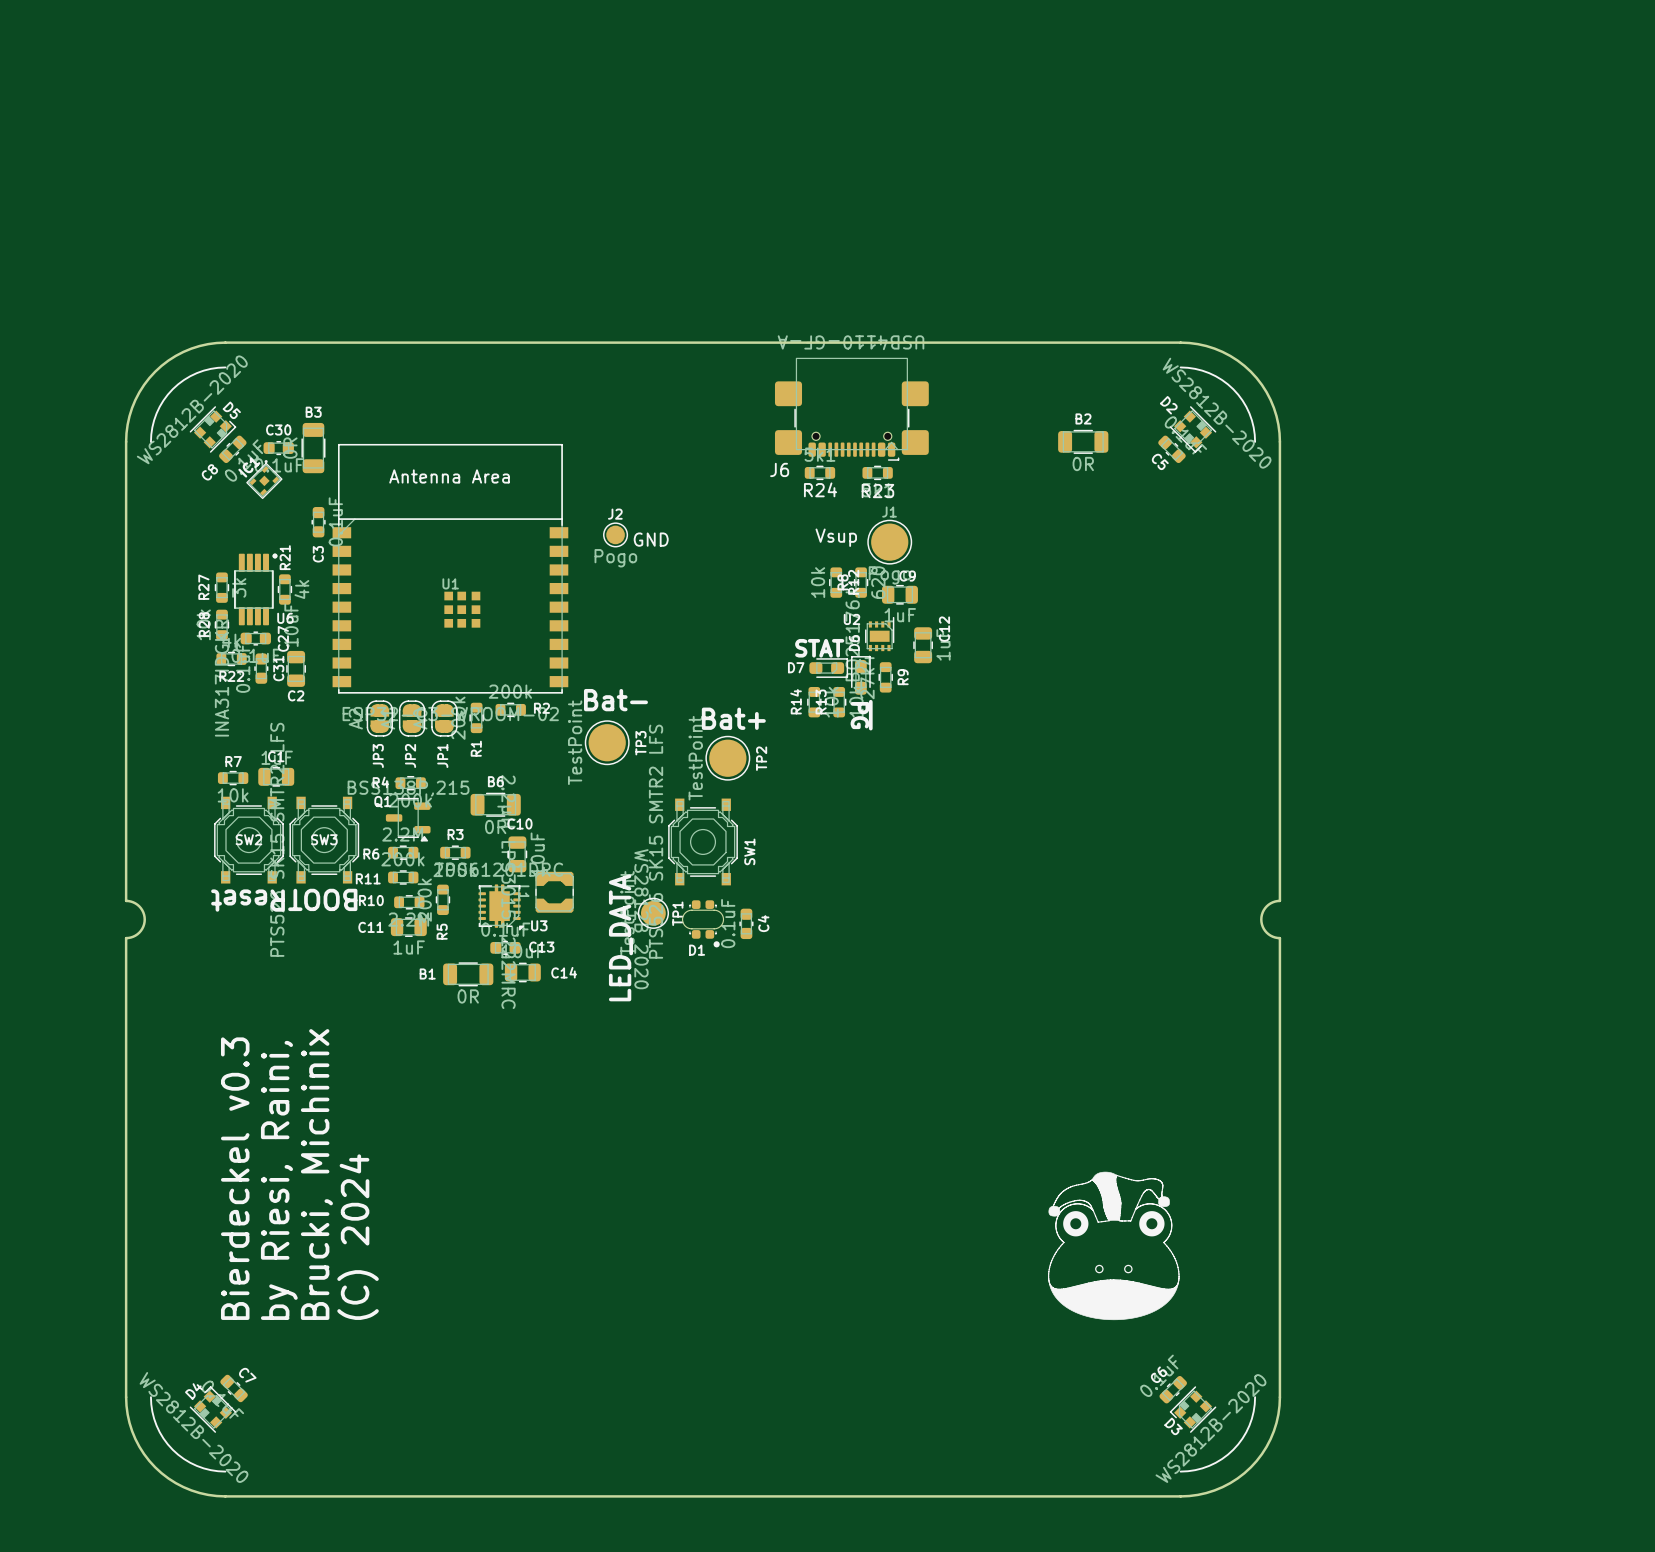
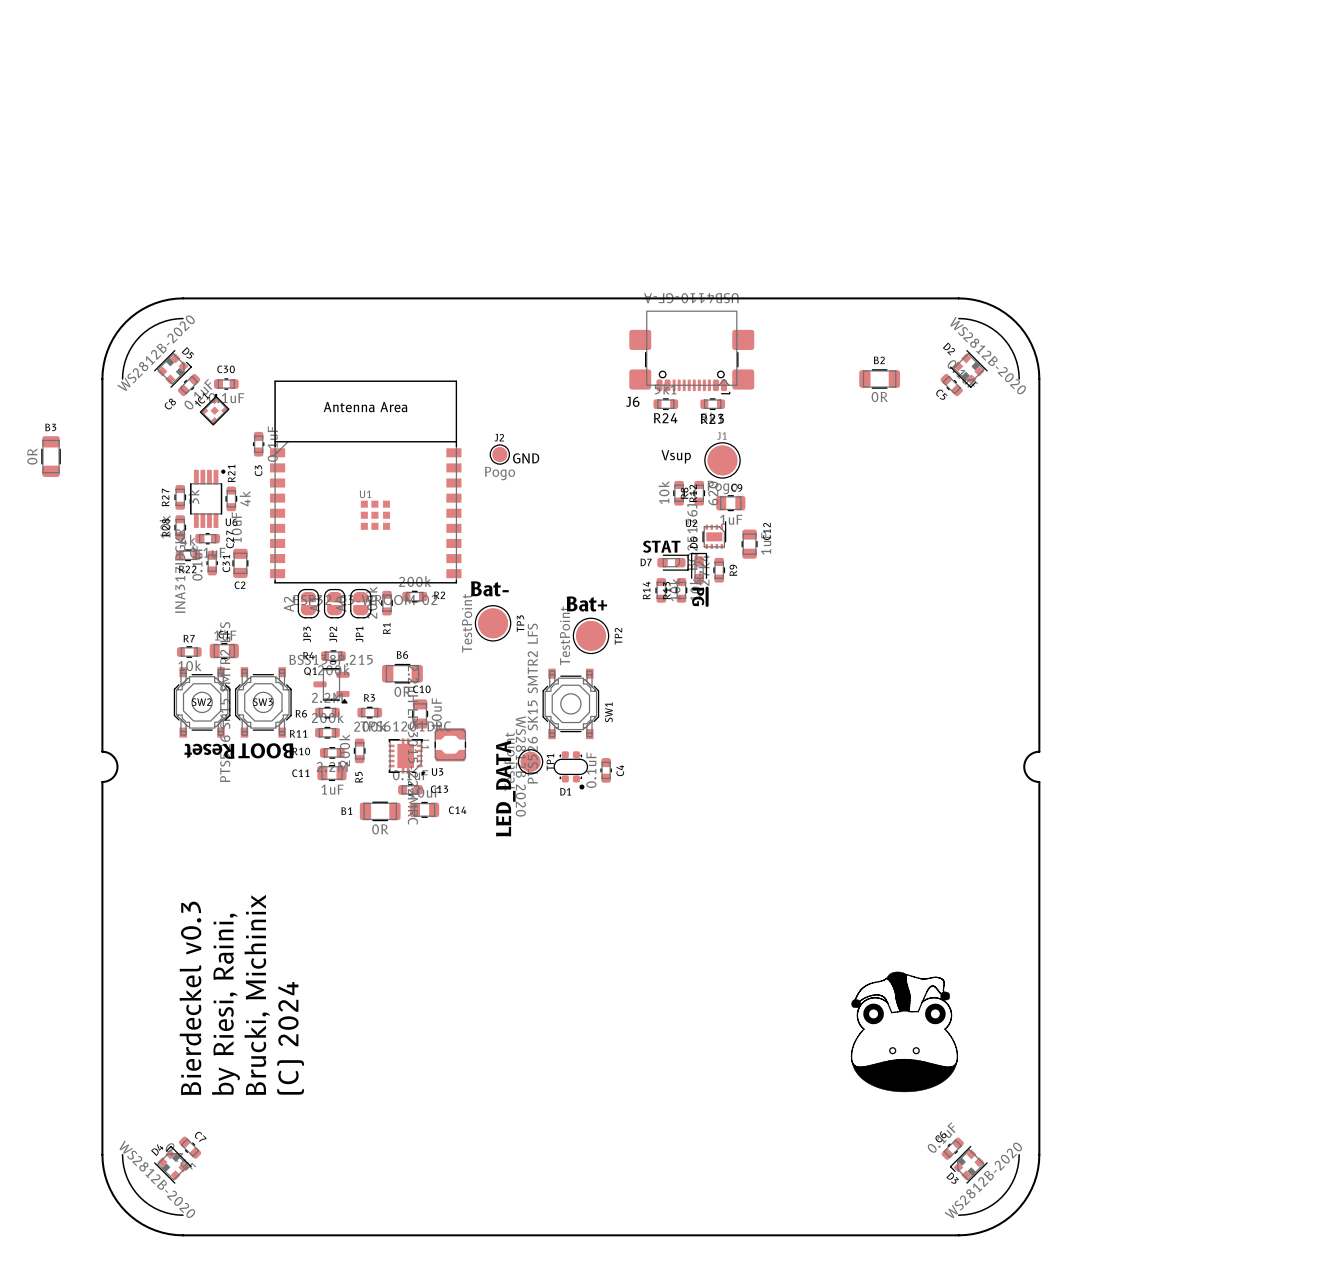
B3 position: (313, 448) -> (51, 456)

